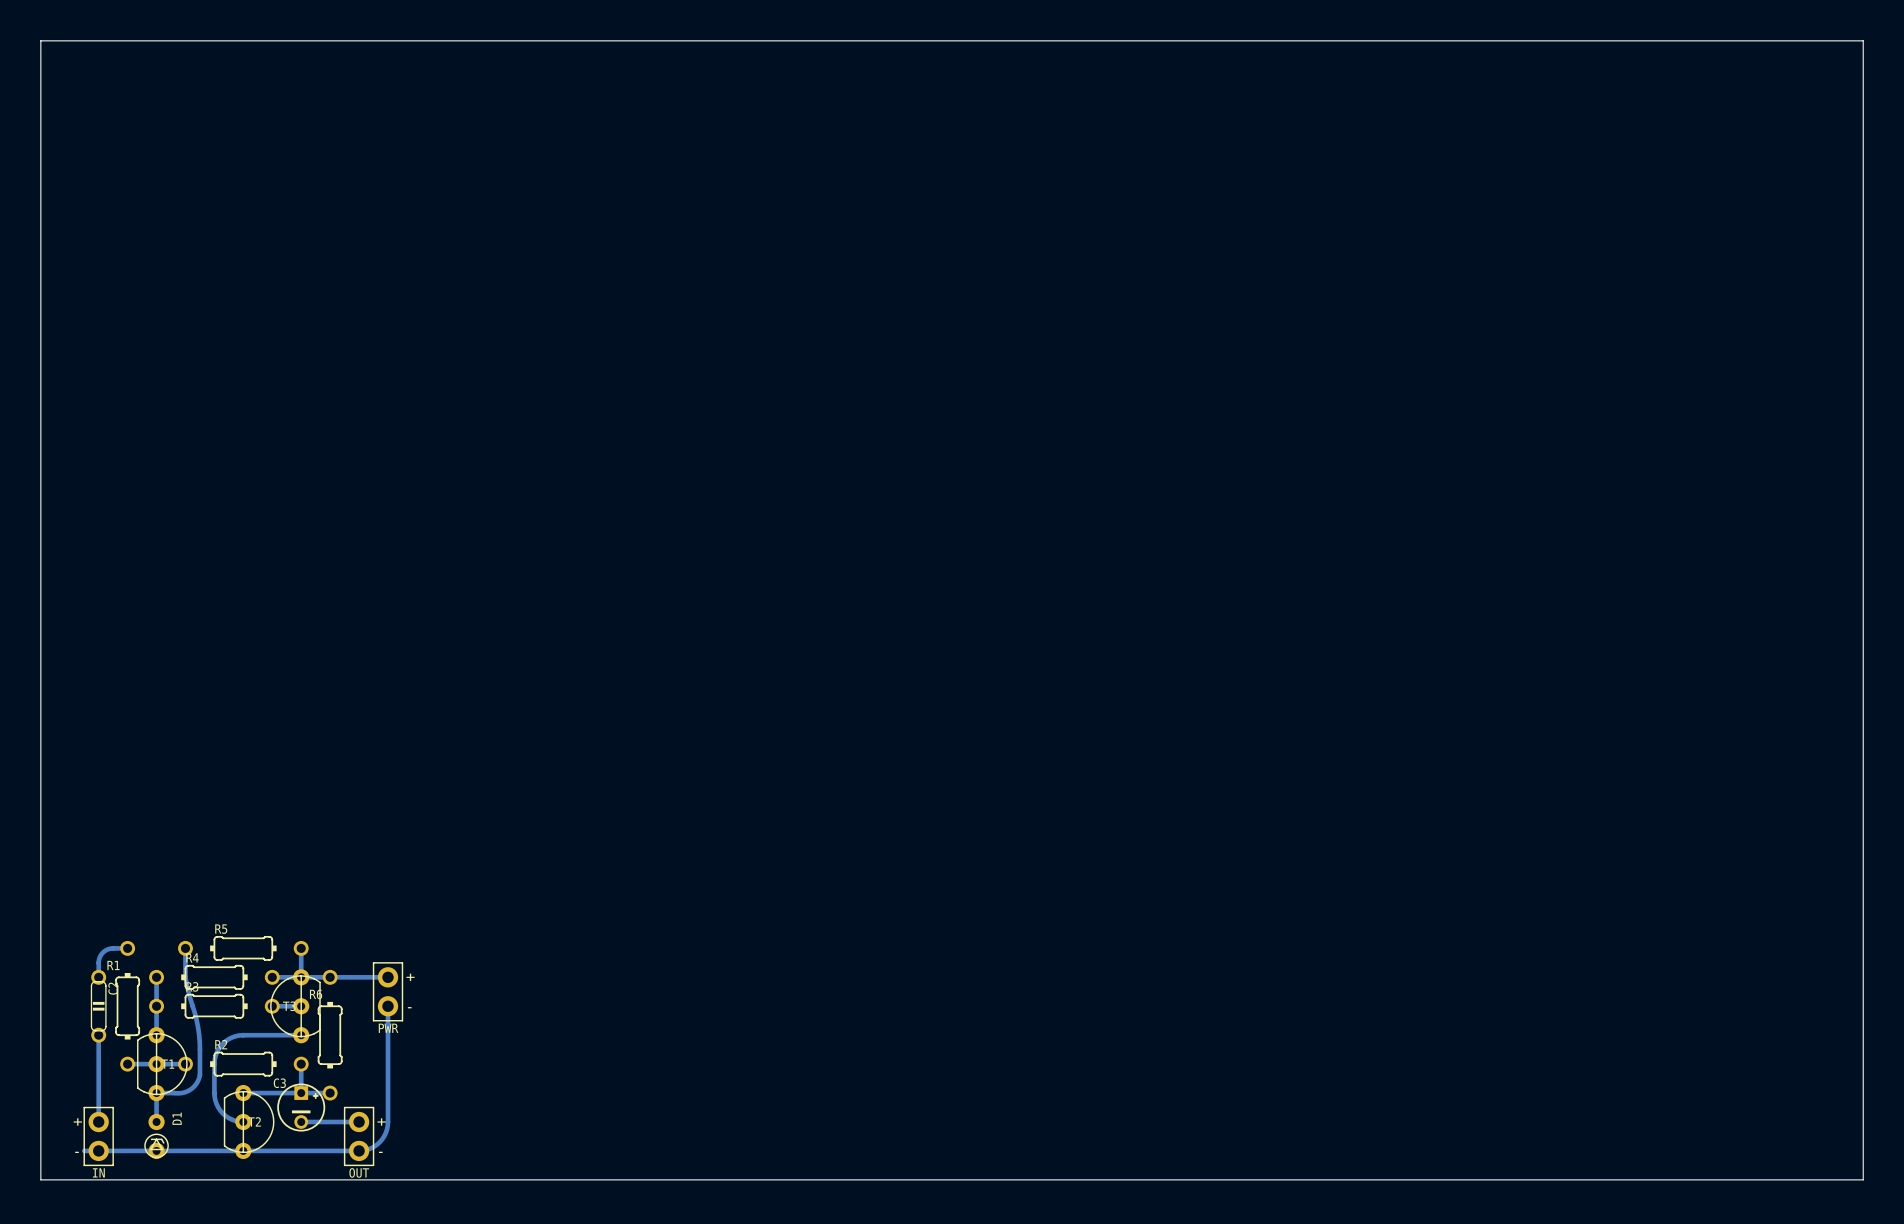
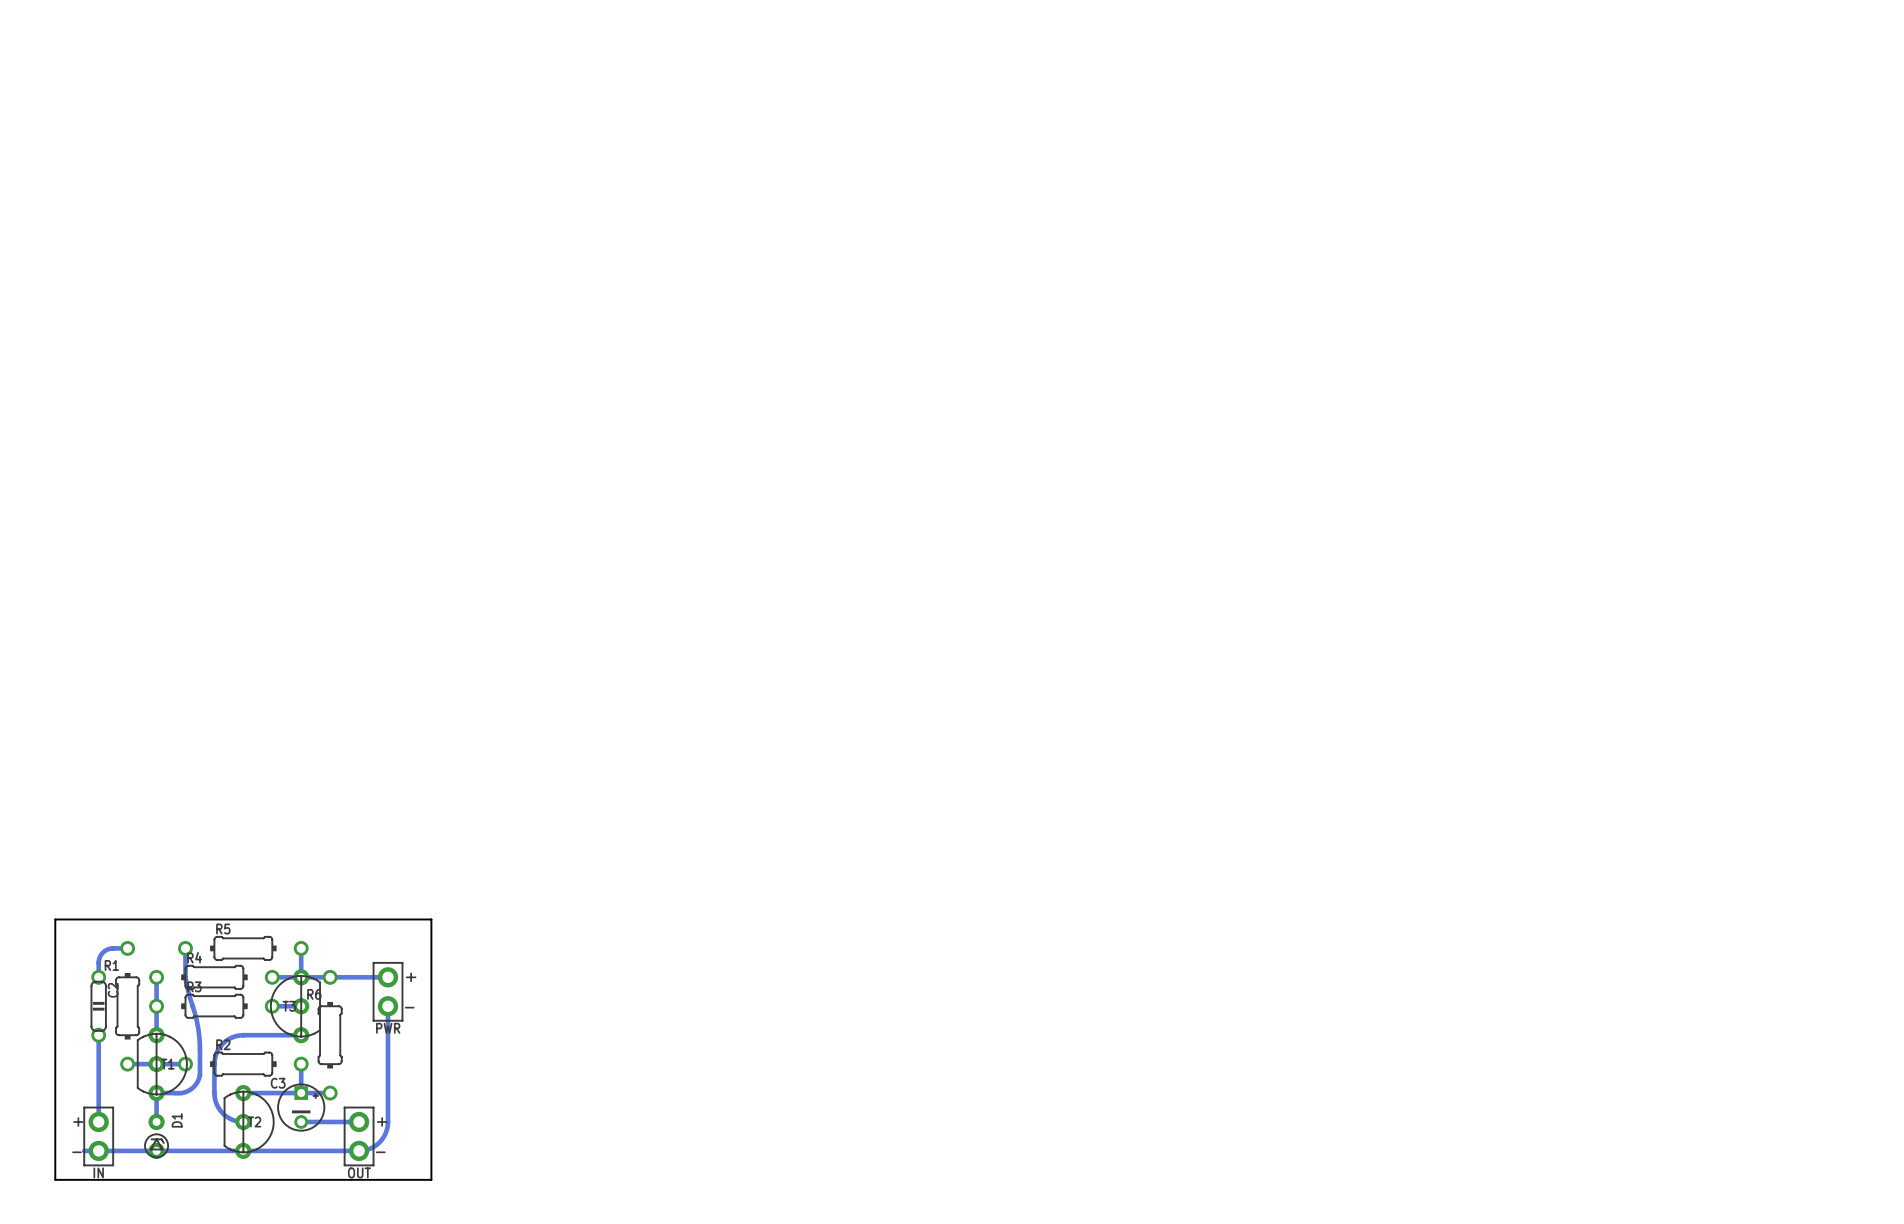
board edge: (55, 1179) (40, 1179) (40, 40) (1863, 40) (1863, 1179) (431, 1179) -> (55, 1179) (55, 919) (431, 919) (431, 1179)

